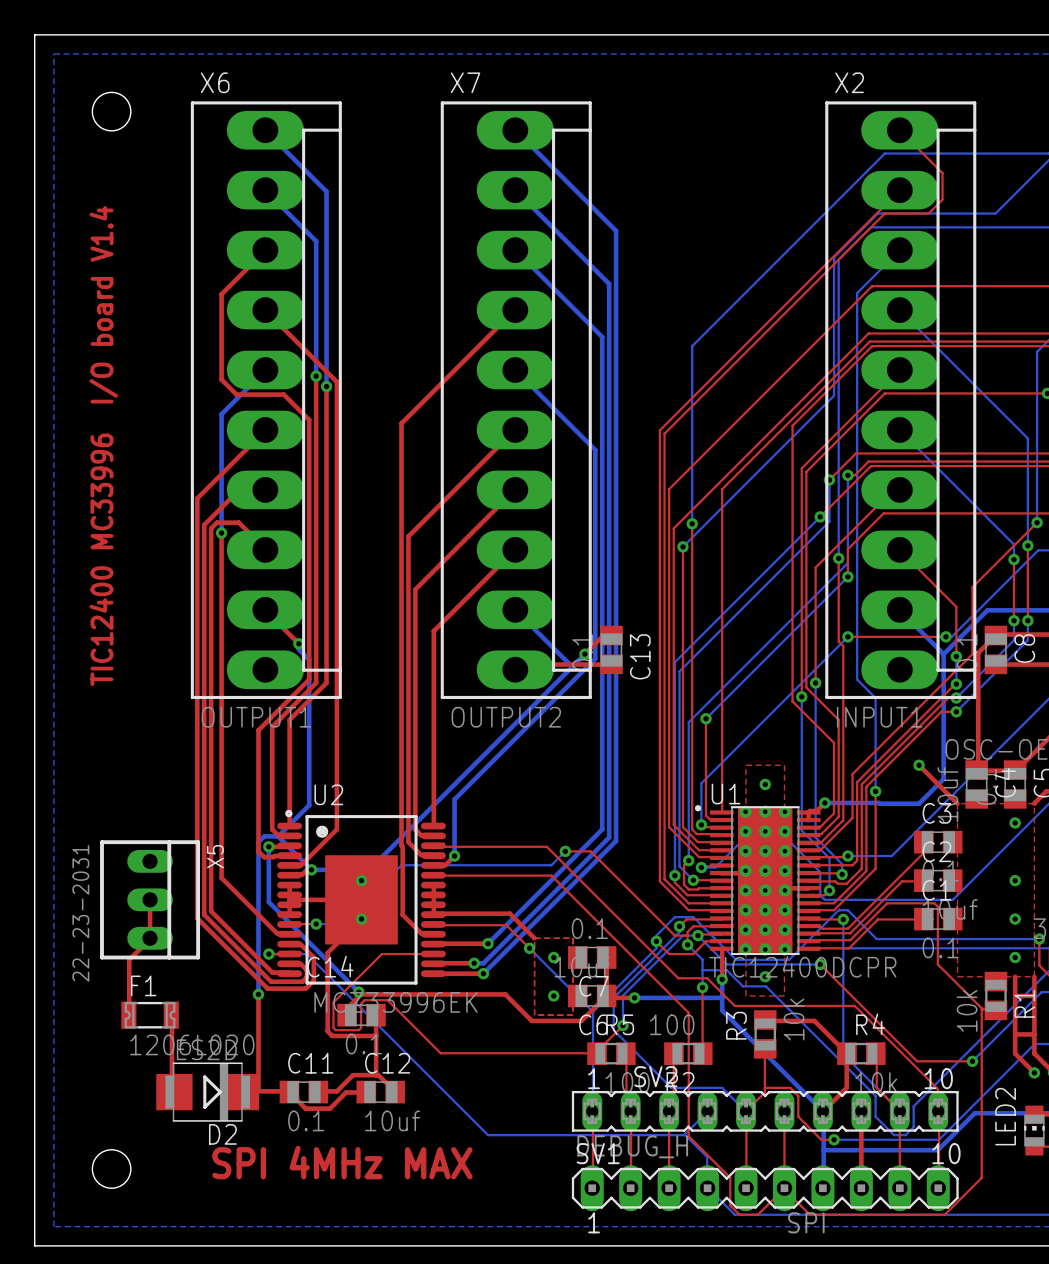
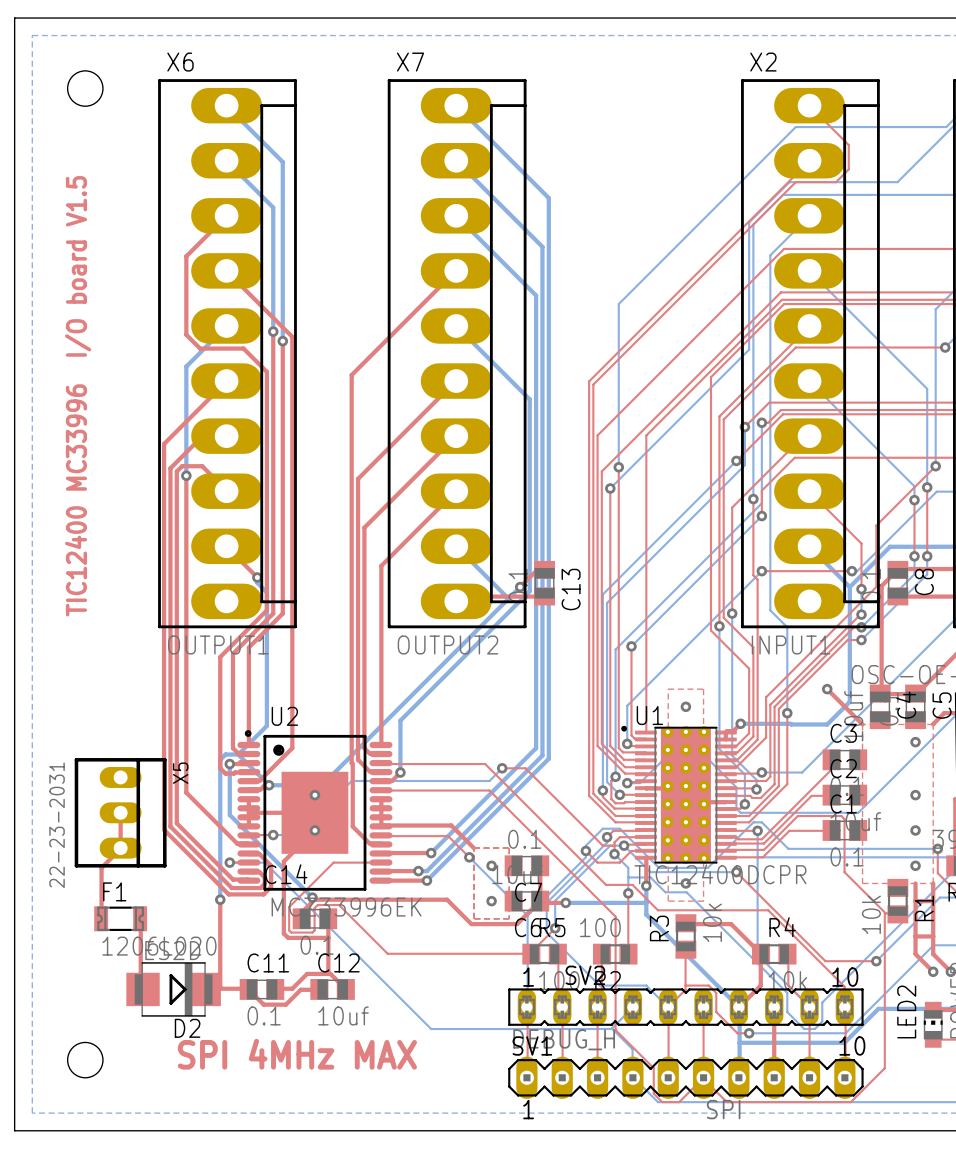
text: TIC12400 MC33996 I/O board V1.4 (103, 446) -> TIC12400 MC33996 I/O board V1.5 (78, 396)

